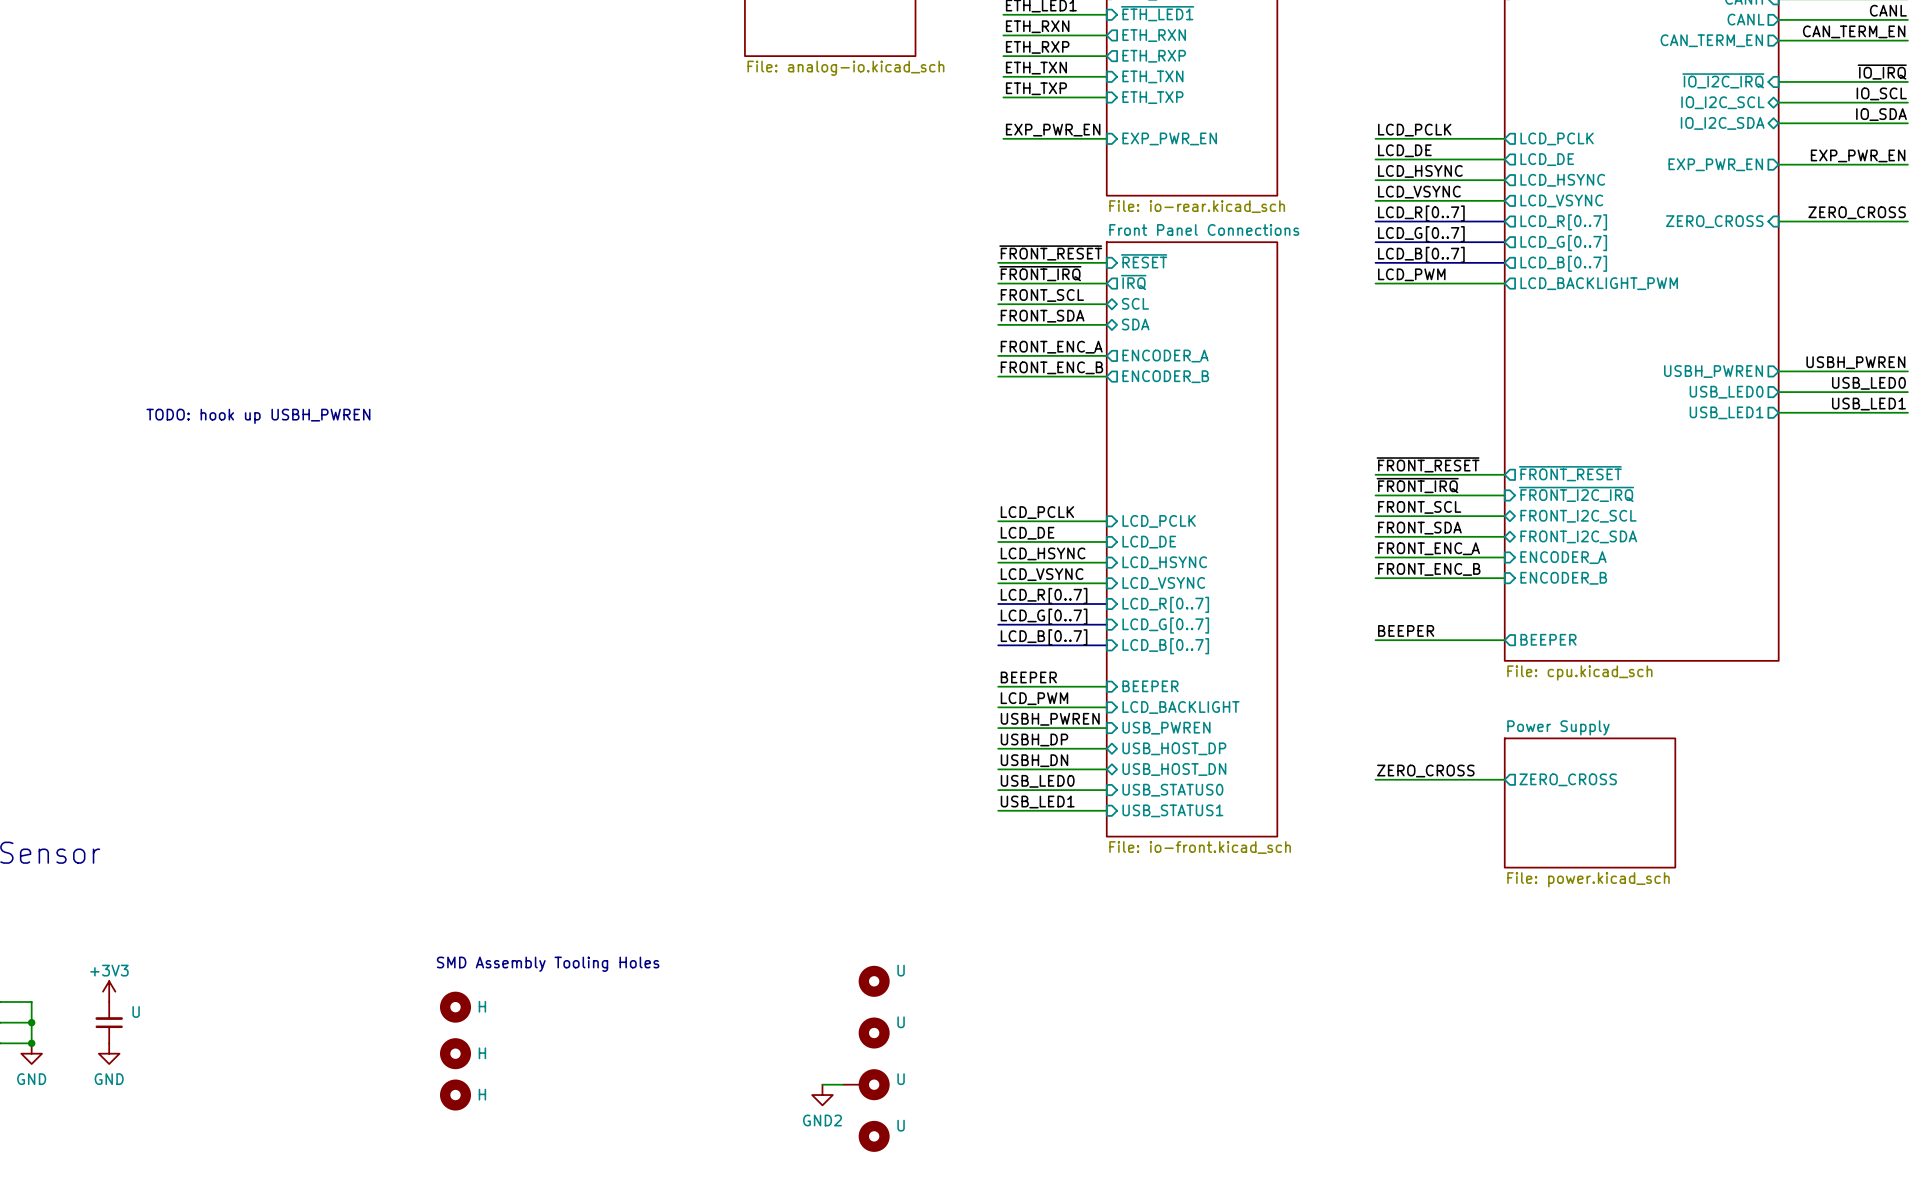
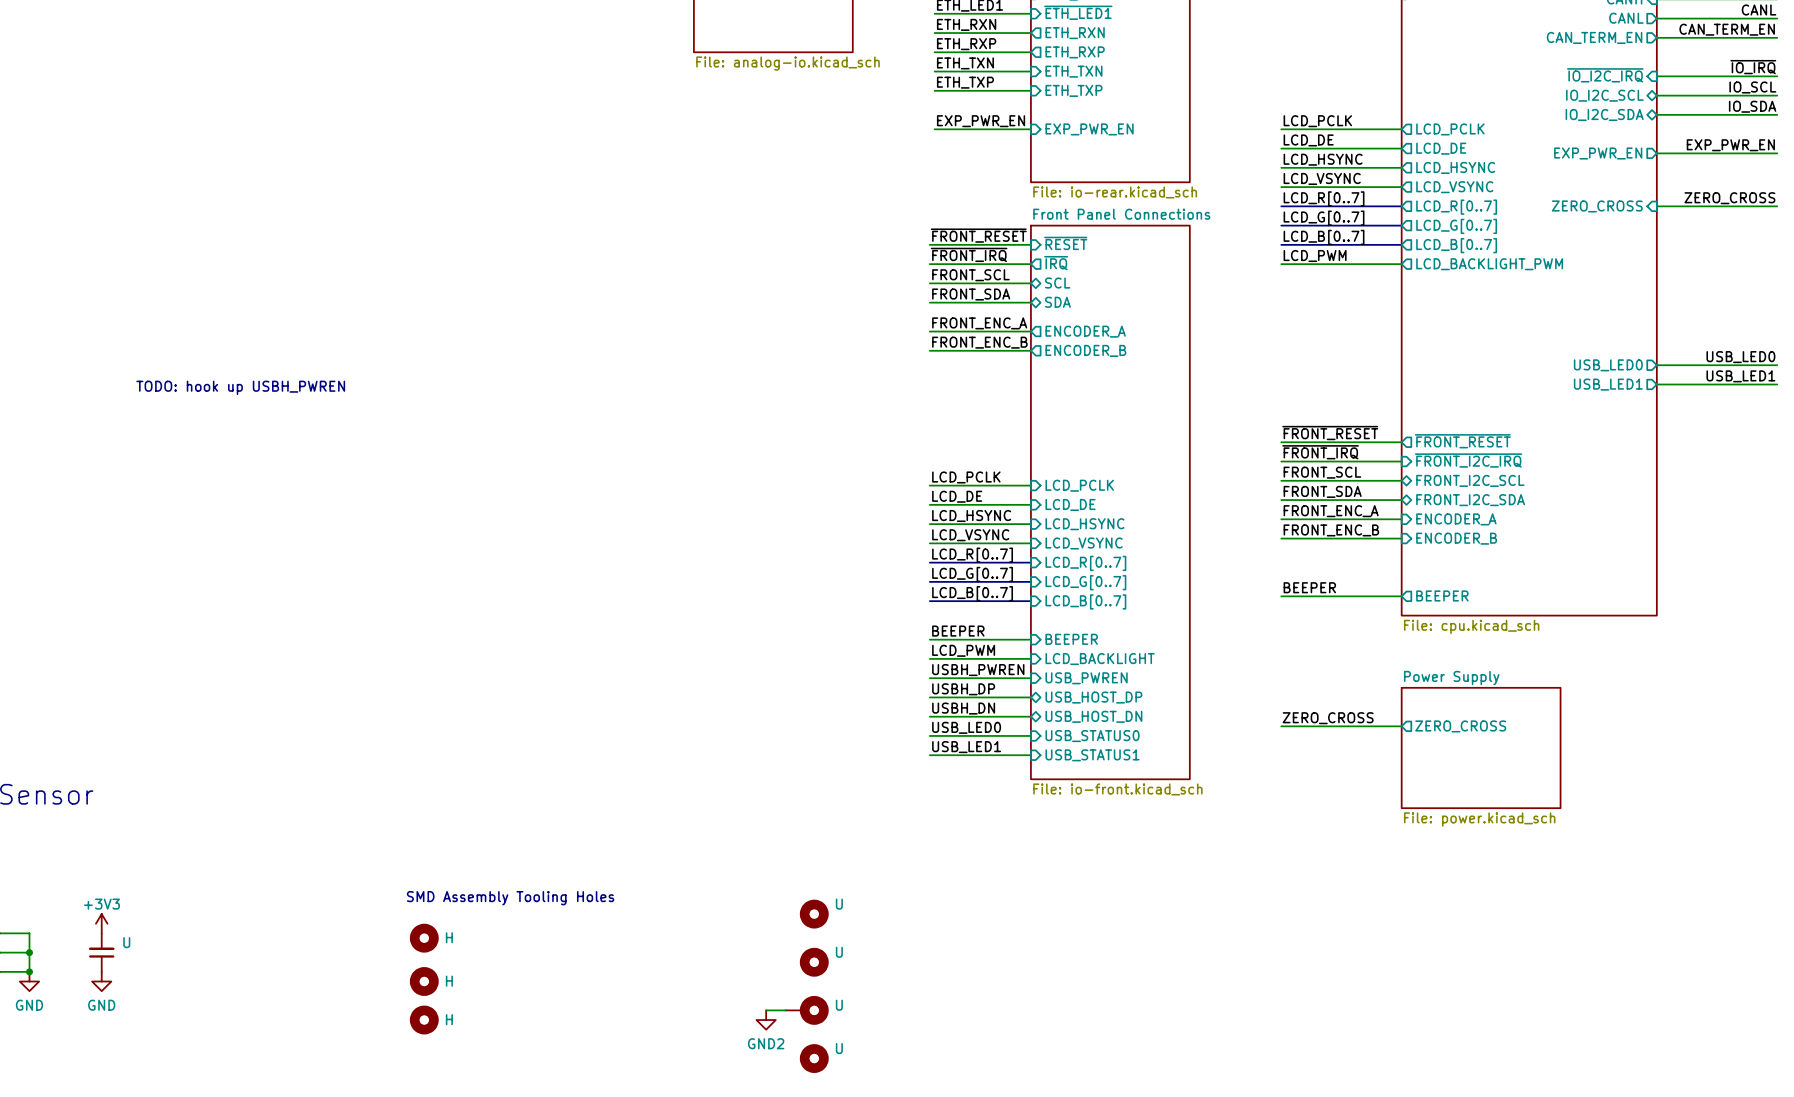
label: USBH_PWREN (1855, 362) -> none
sheet pin: USBH_PWREN (1713, 371) -> none
wire: (1778, 371) (1907, 371) -> none

